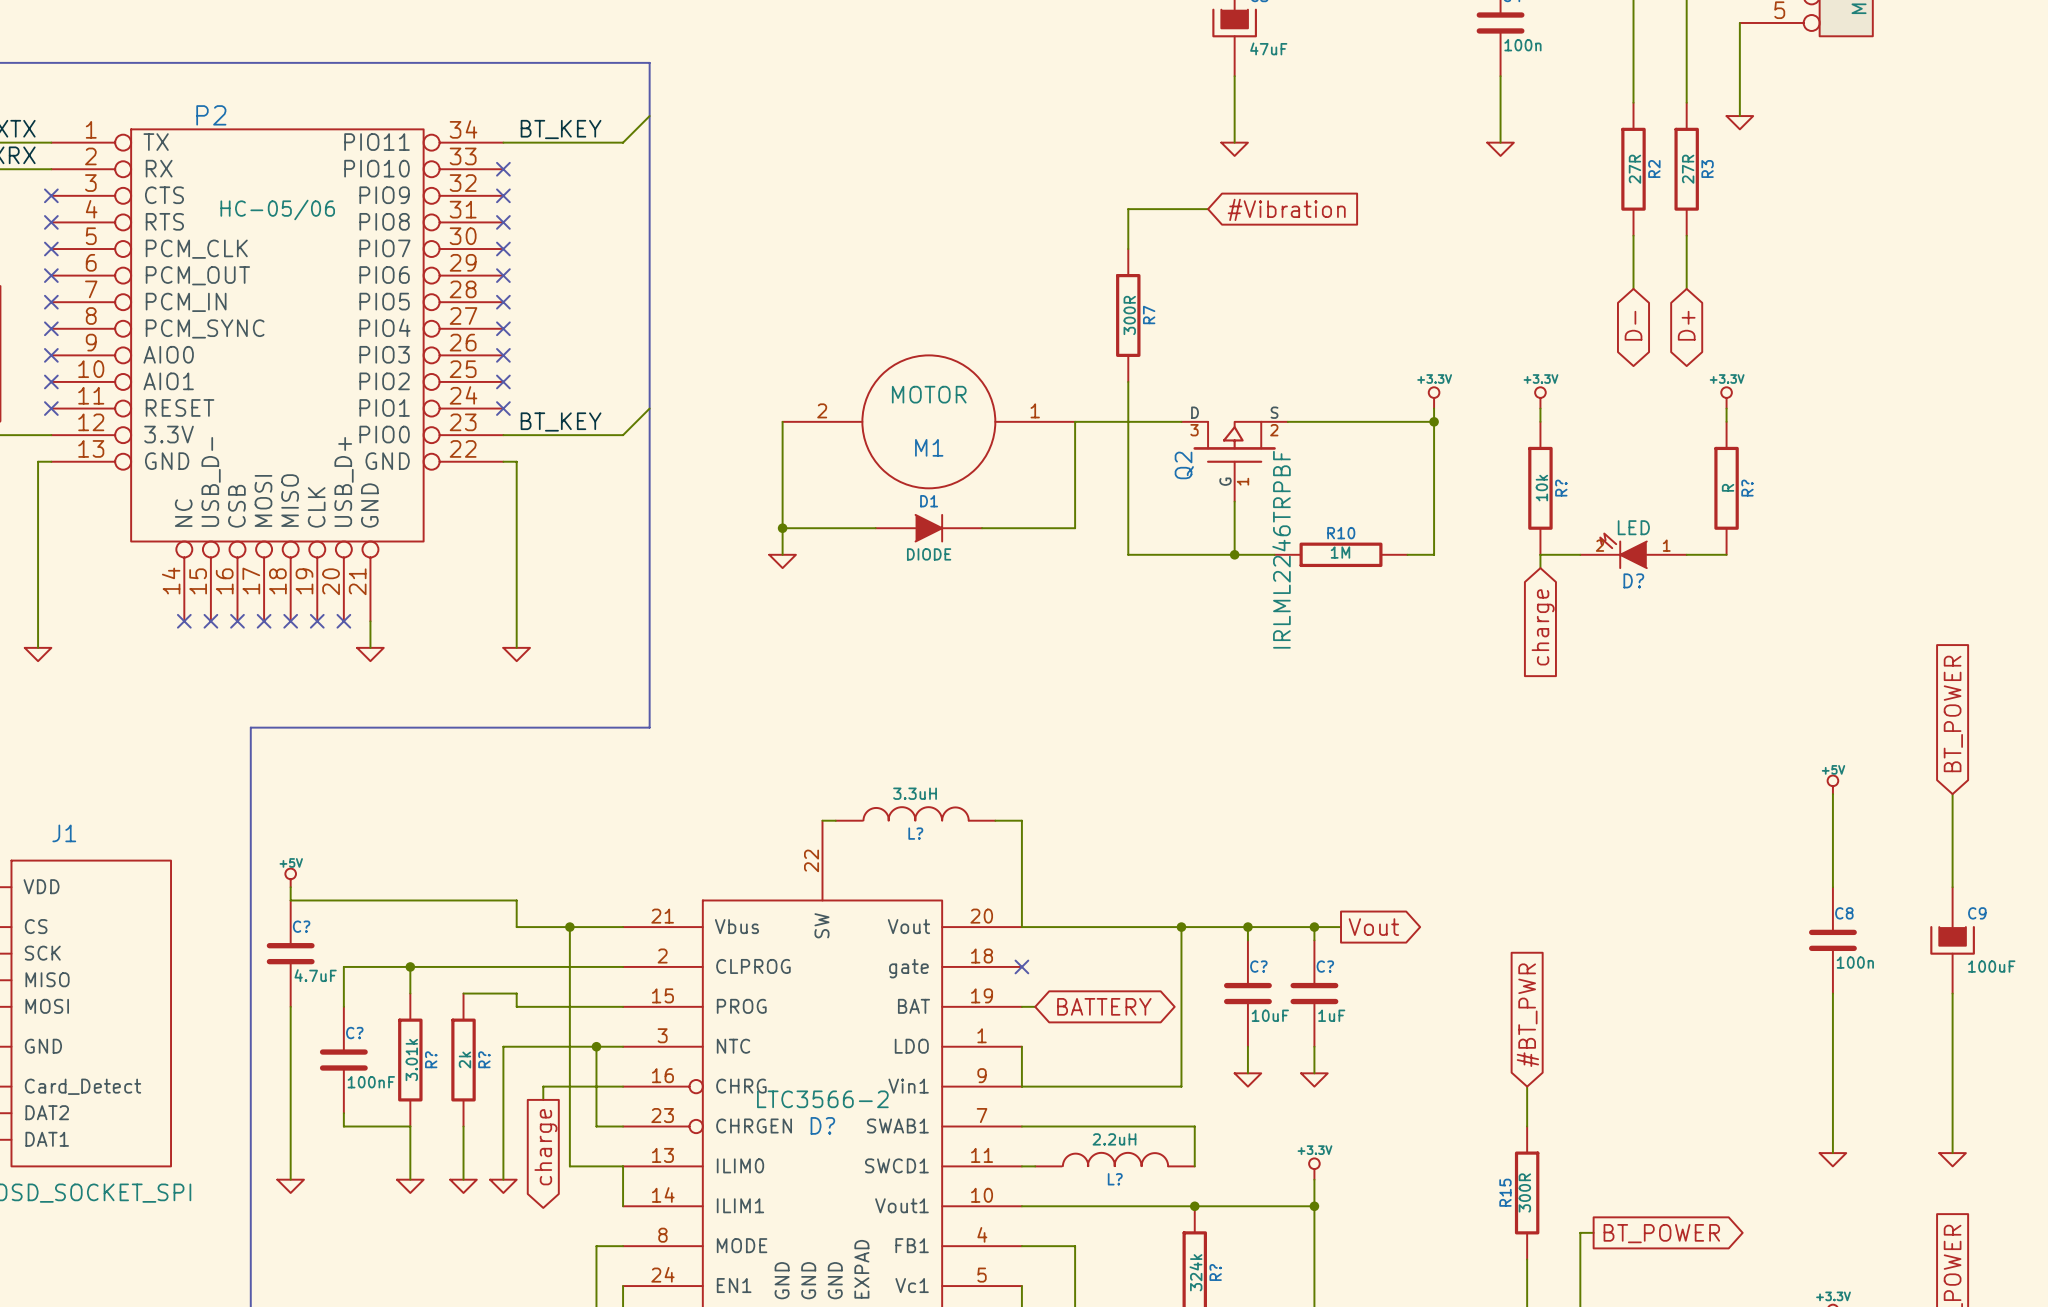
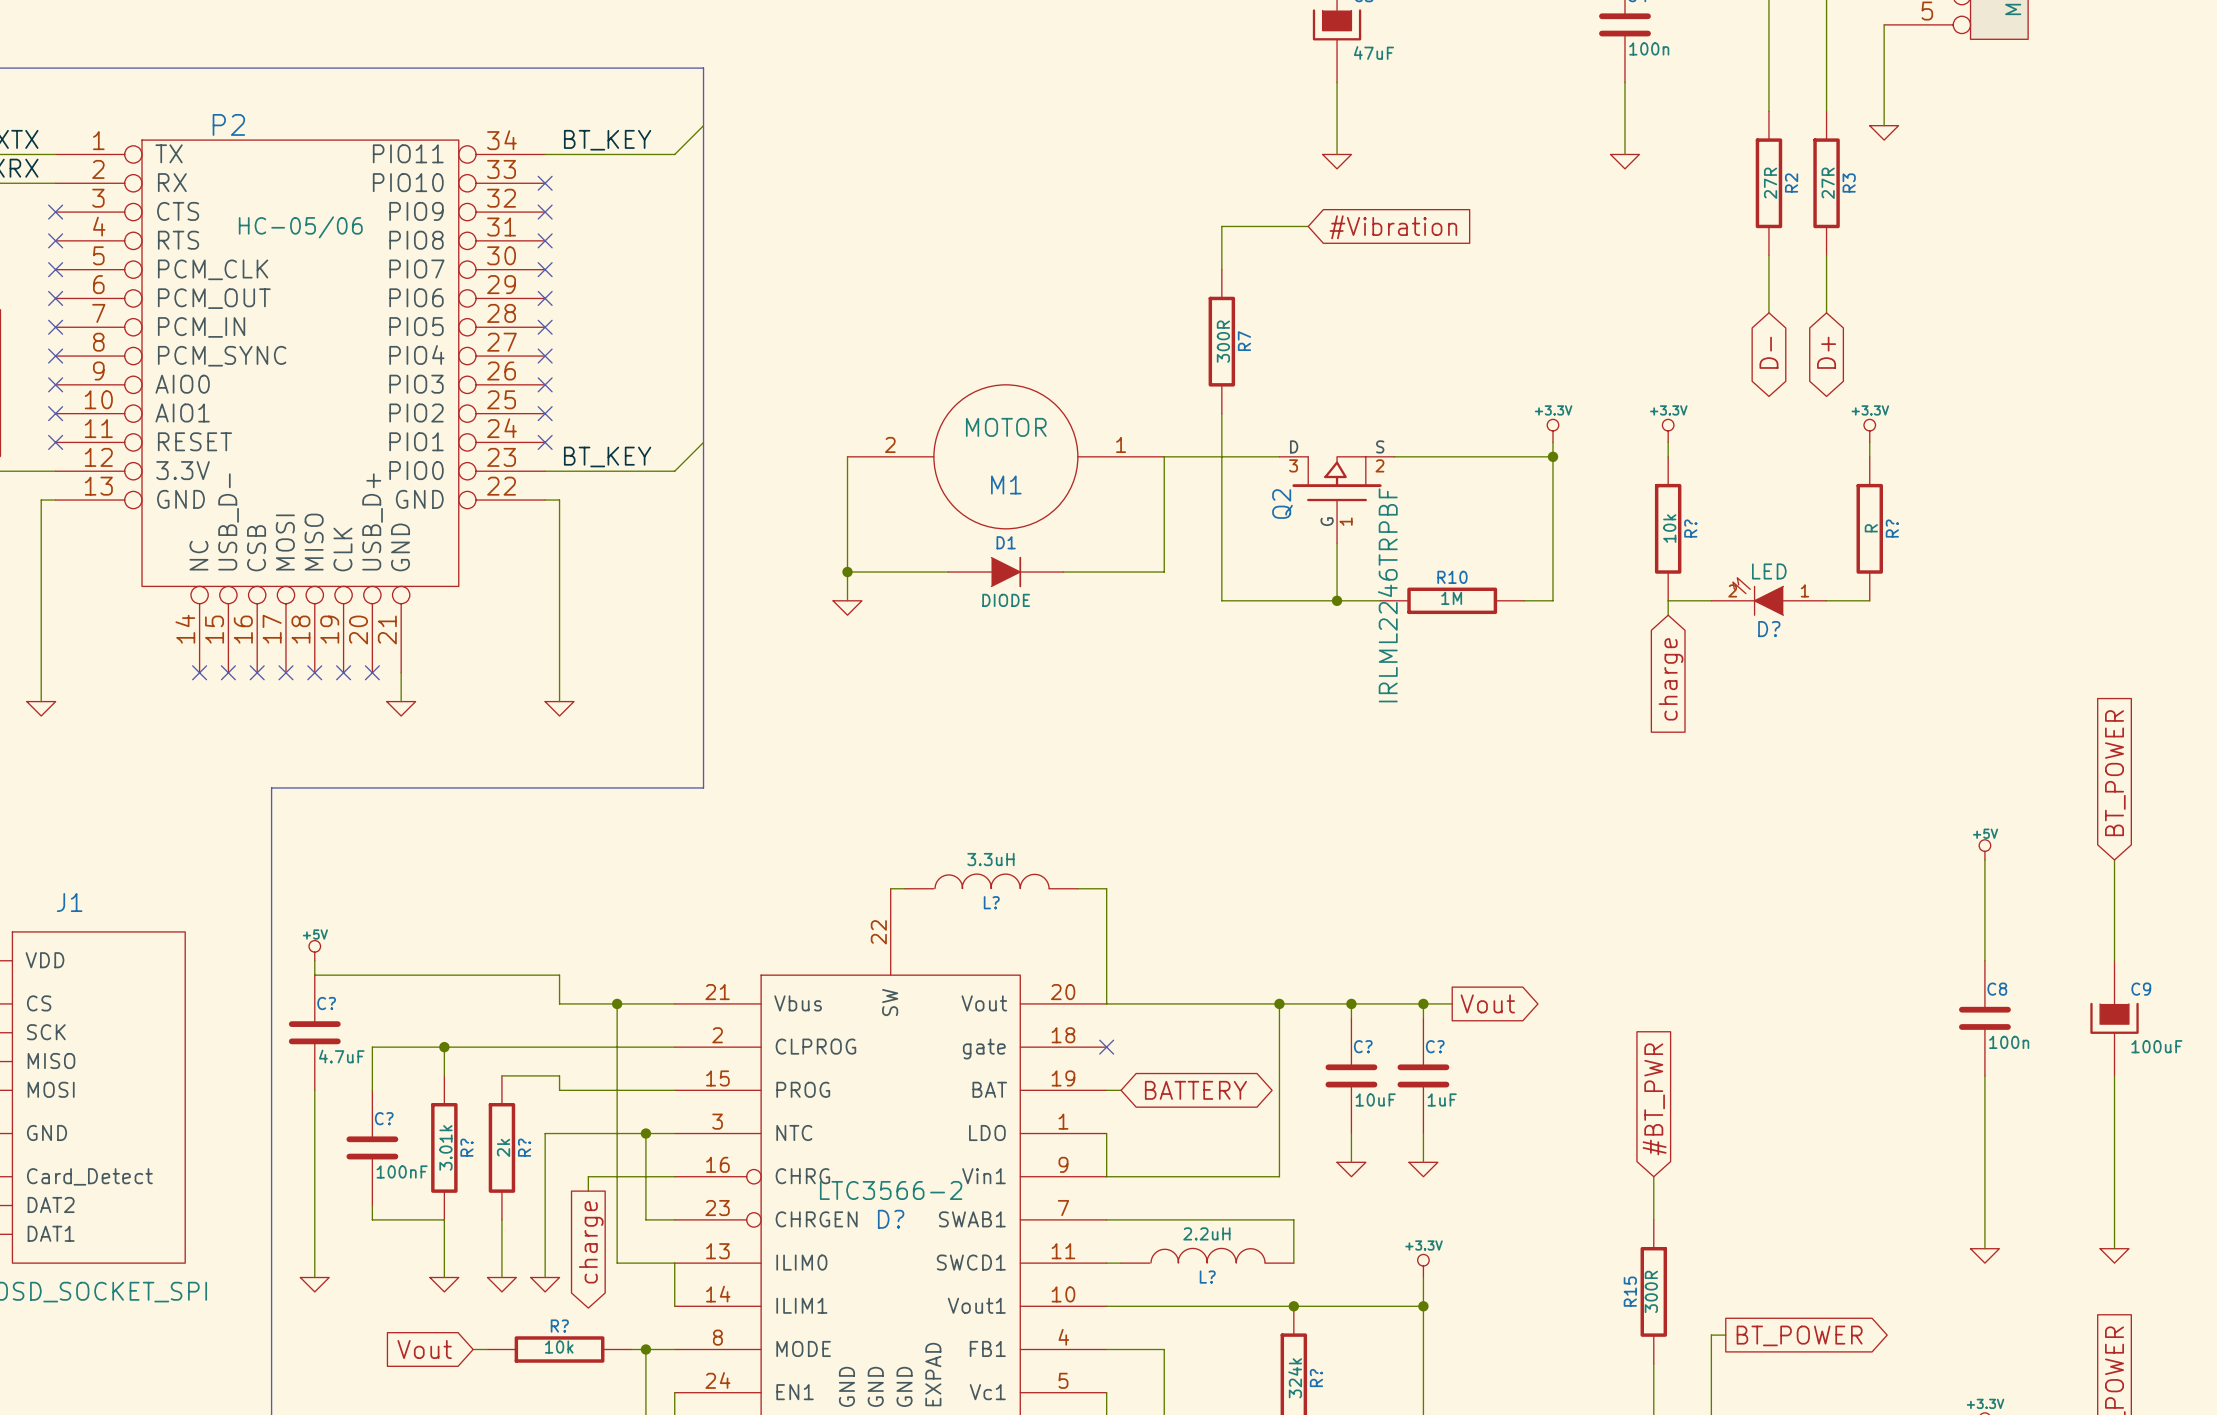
global label: none -> Vout (424, 1349)
wire: none -> (473, 1349) (487, 1349)
R?: none -> 10k (559, 1349)
wire: none -> (631, 1349) (645, 1349)
junction: none -> (645, 1349)

